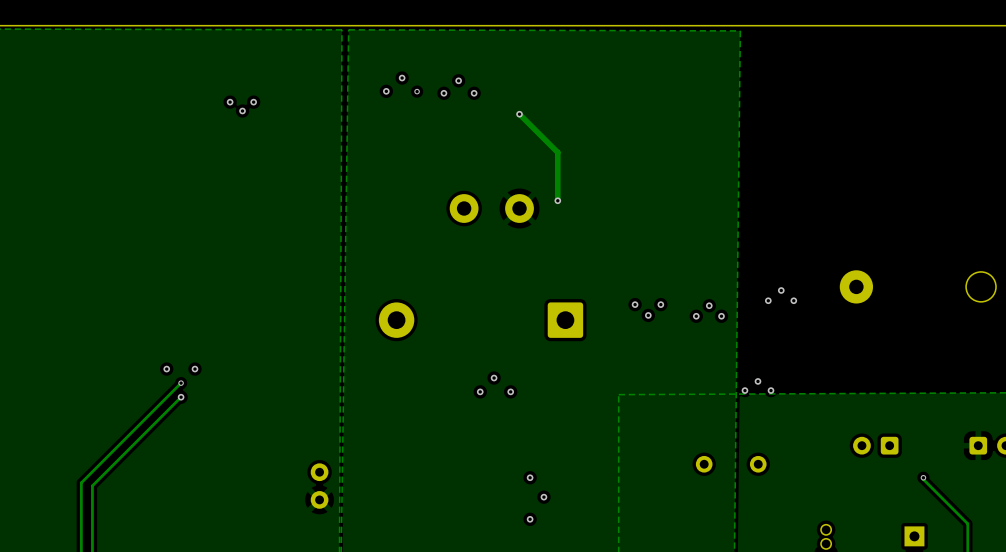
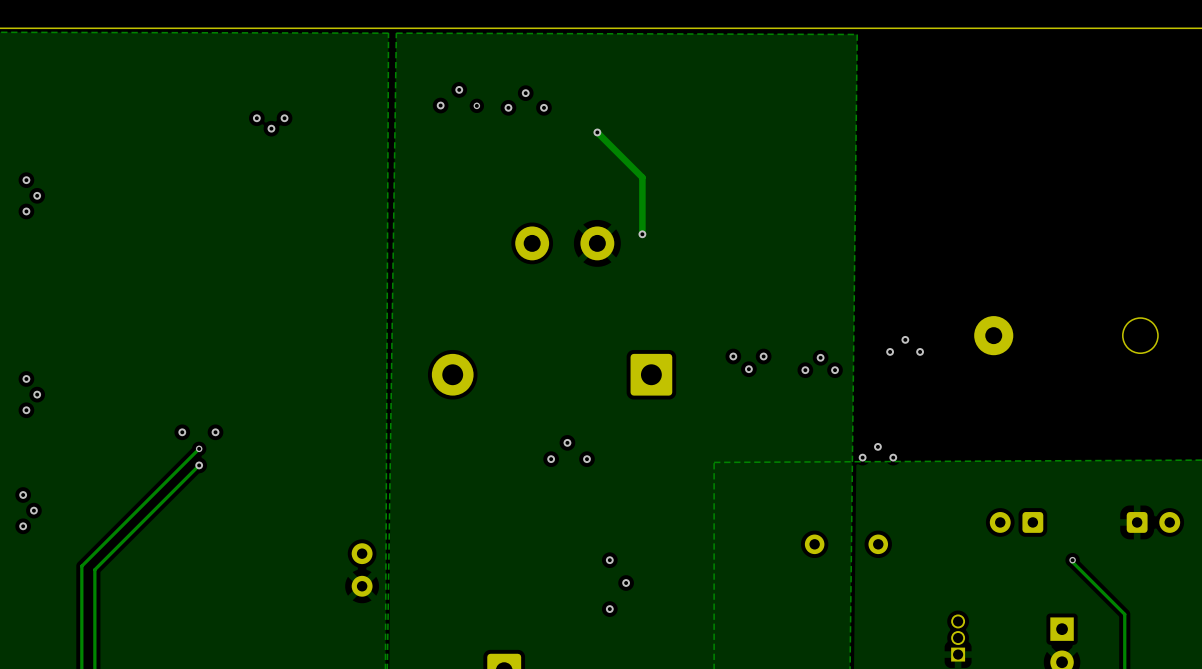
via: none -> (26, 180)
via: none -> (37, 195)
via: none -> (26, 211)
via: none -> (26, 378)
via: none -> (37, 394)
via: none -> (26, 410)
via: none -> (23, 495)
via: none -> (33, 510)
via: none -> (23, 526)

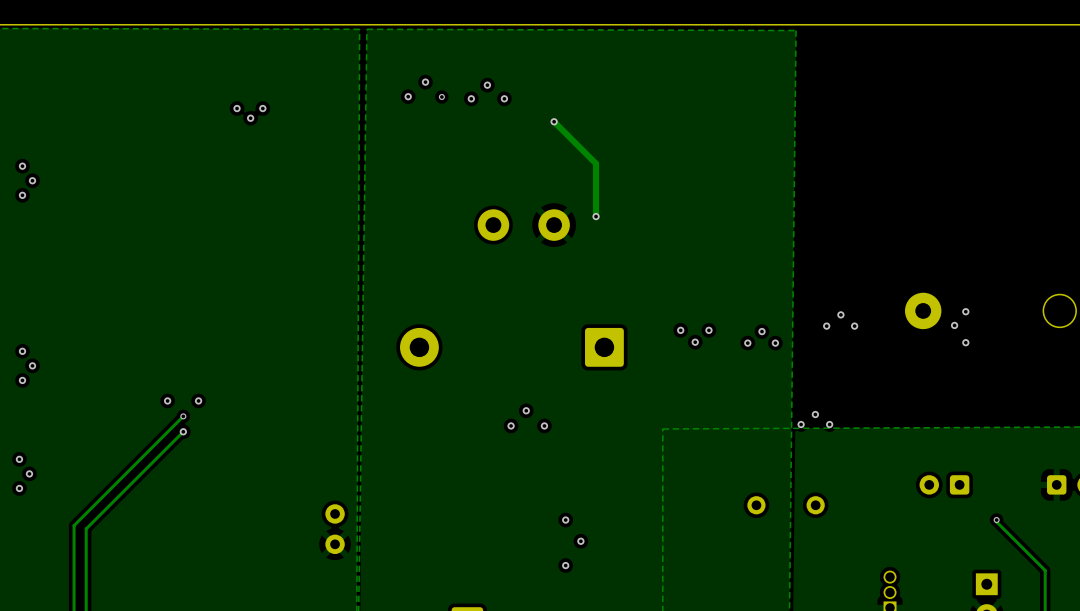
via: none -> (965, 311)
via: none -> (954, 325)
via: none -> (965, 342)

